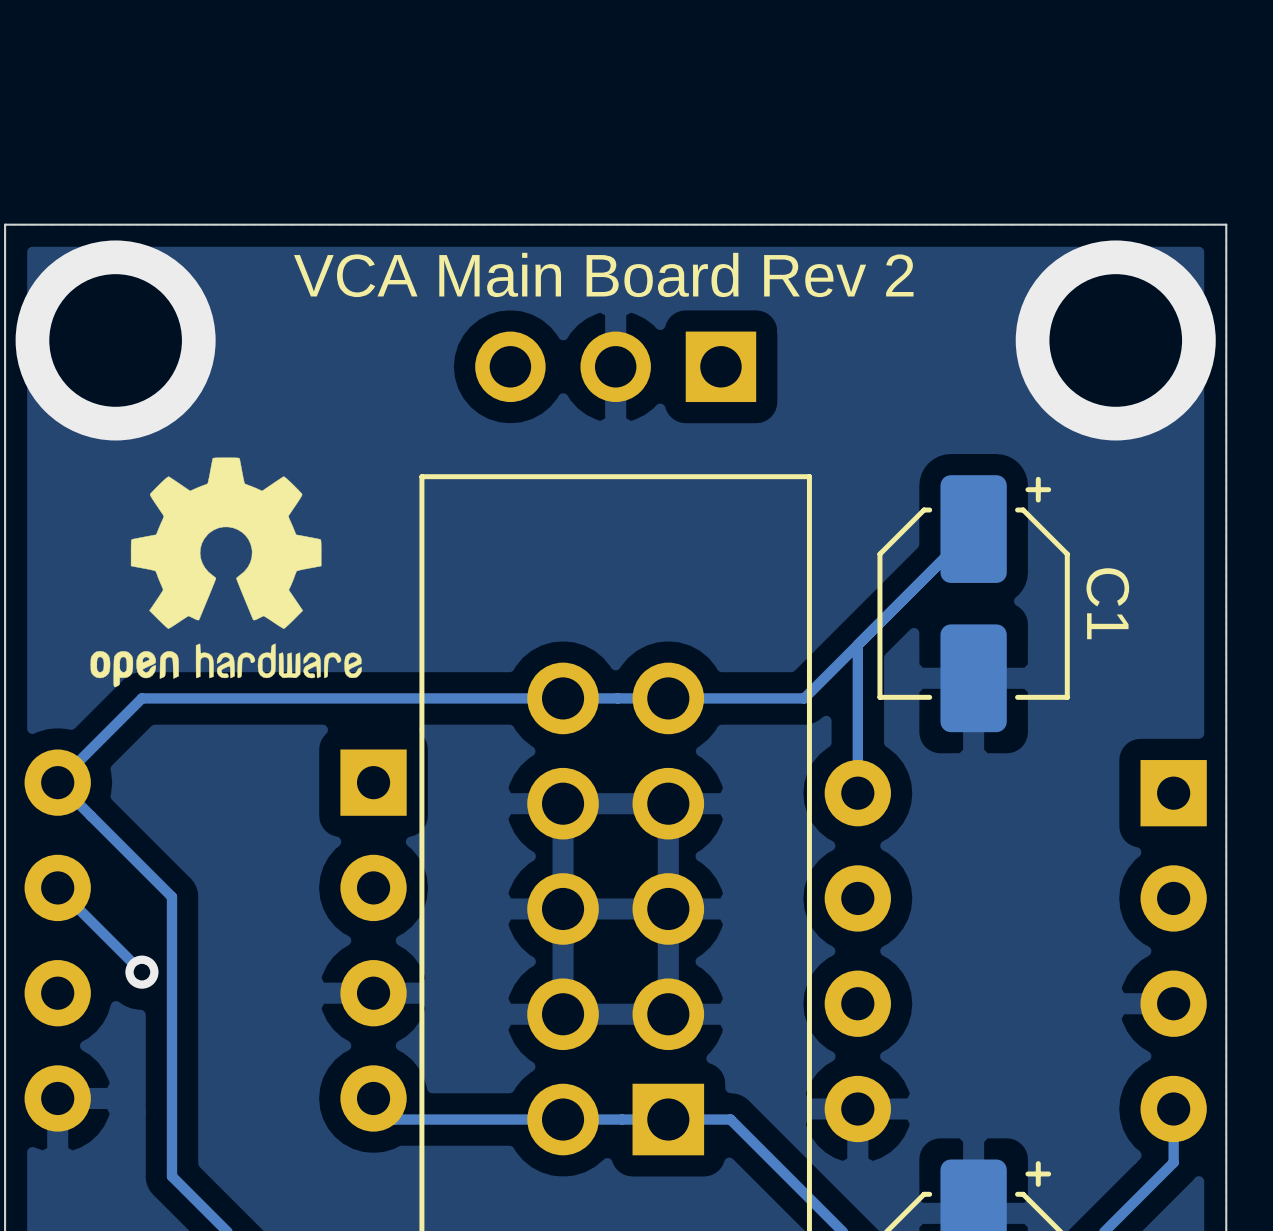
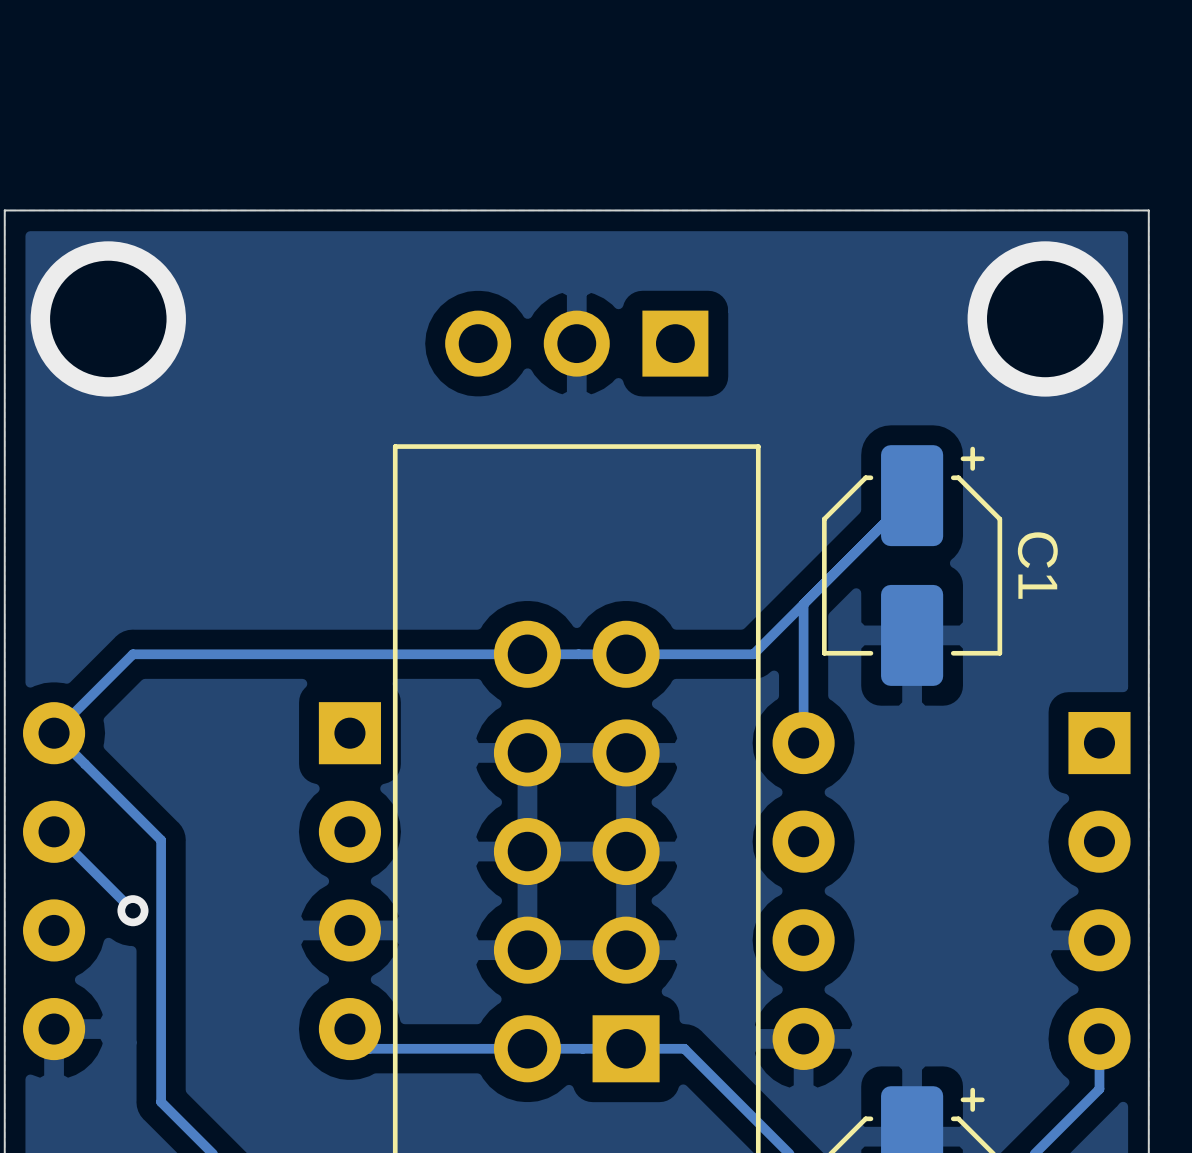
via size: [15, 240, 216, 441] -> [30, 241, 186, 397]
via size: [1015, 240, 1216, 441] -> [967, 241, 1123, 397]
text: VCA Main Board Rev 2 (603, 274) -> none
drawing: [90, 457, 362, 688] -> none

